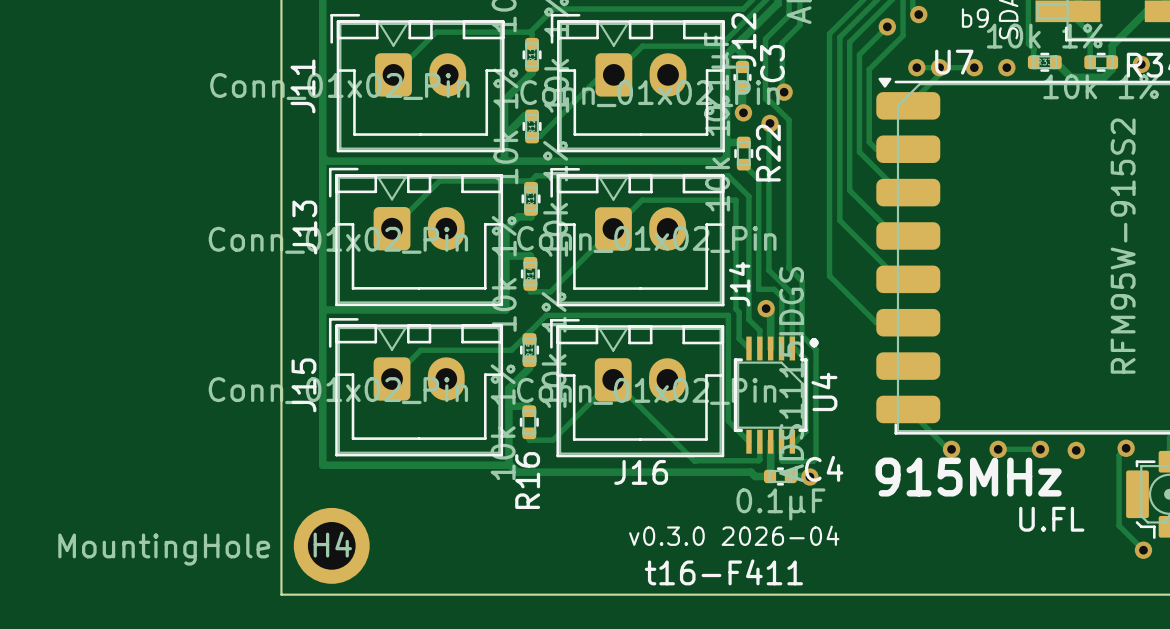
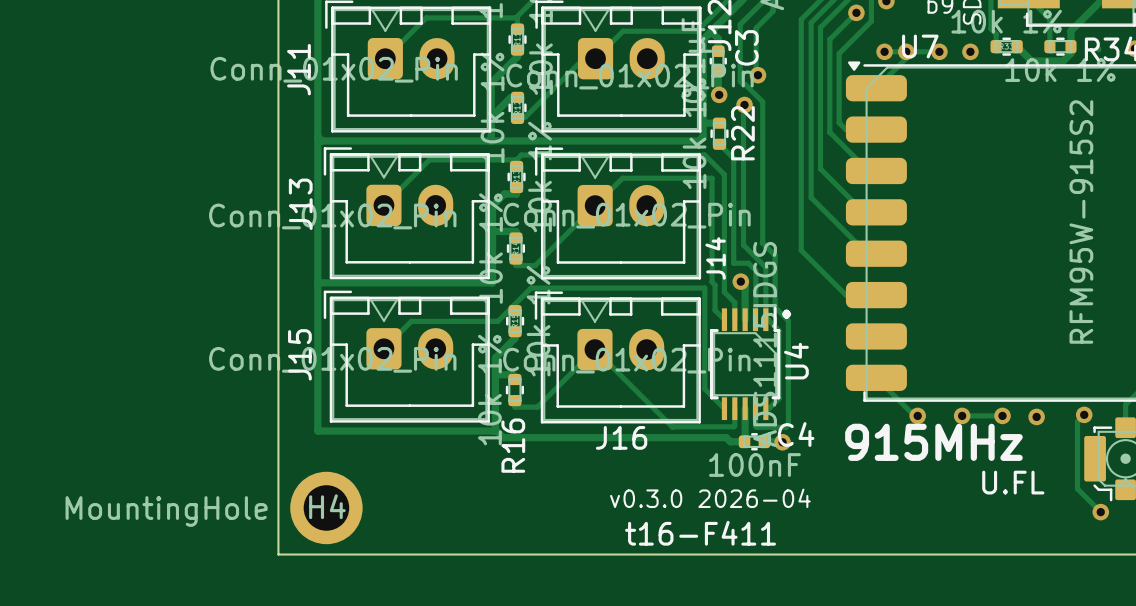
via: (1141, 64) -> none
C4 value: 0.1µF (780, 504) -> 100nF (754, 464)

